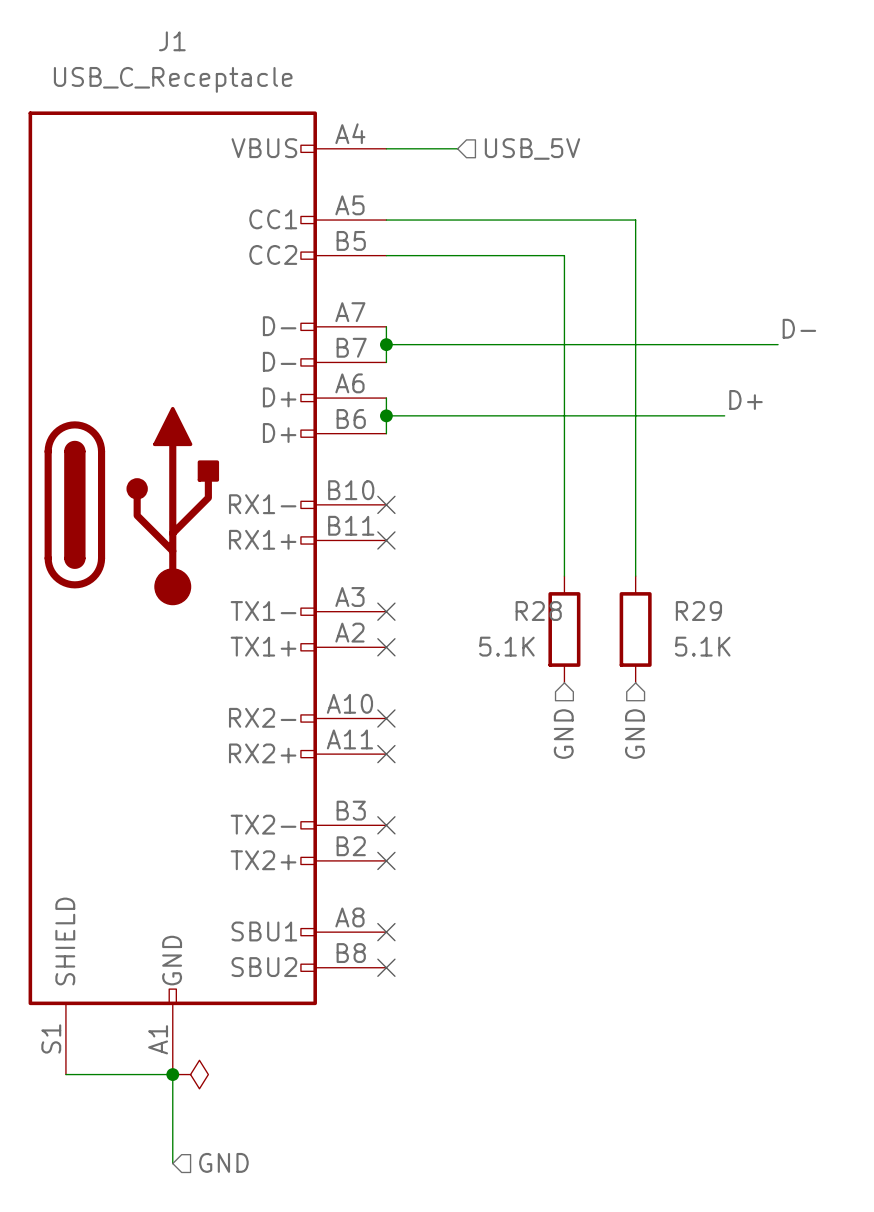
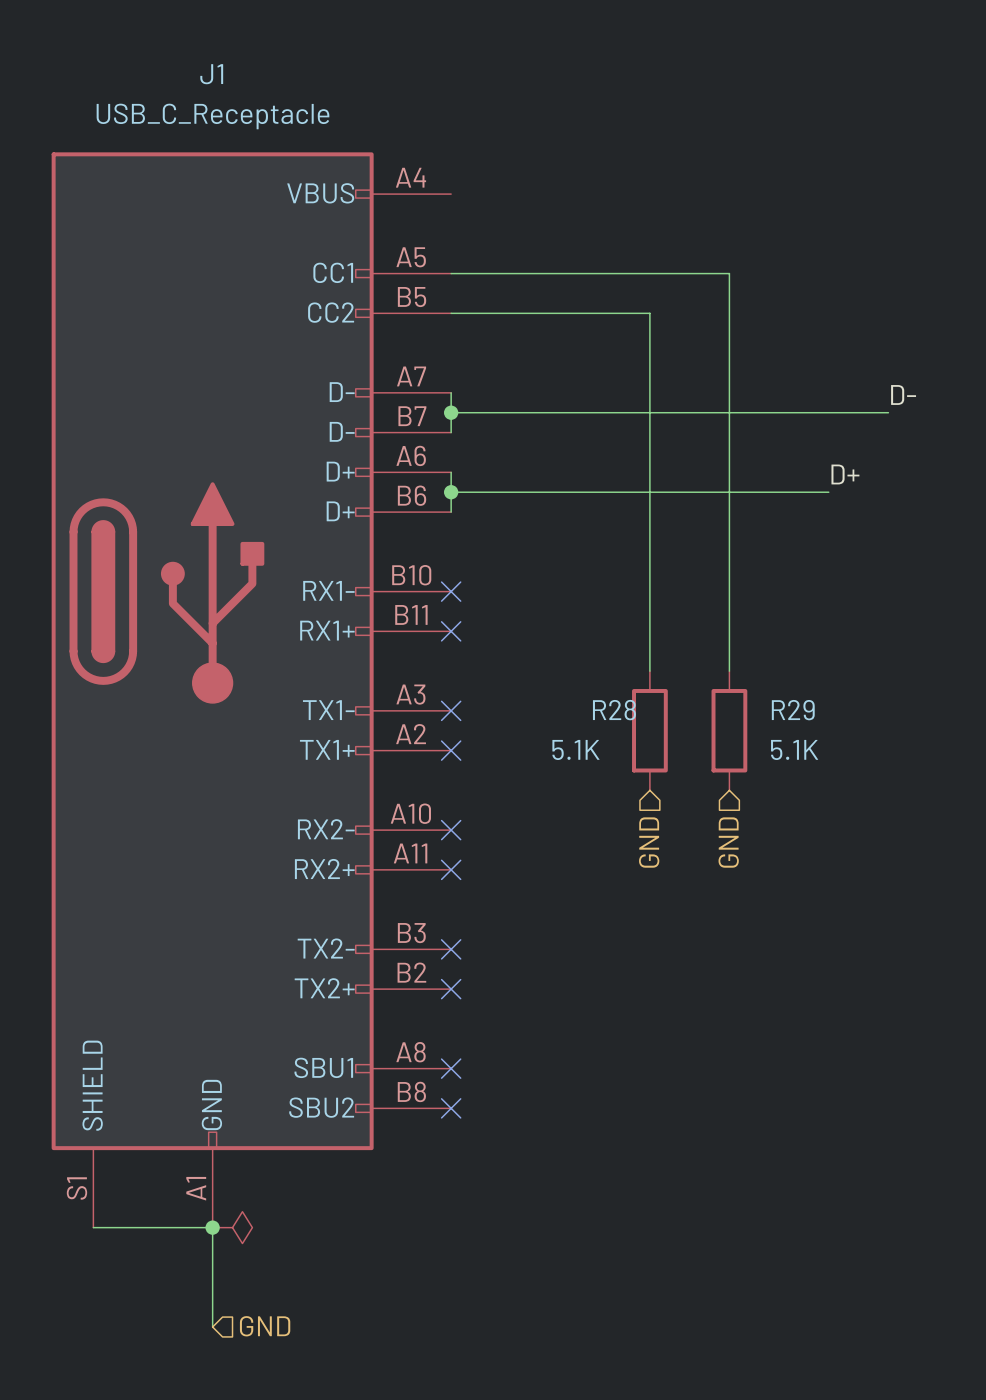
wire: (386, 148) (457, 148) -> none
hierarchical label: USB_5V (532, 148) -> none

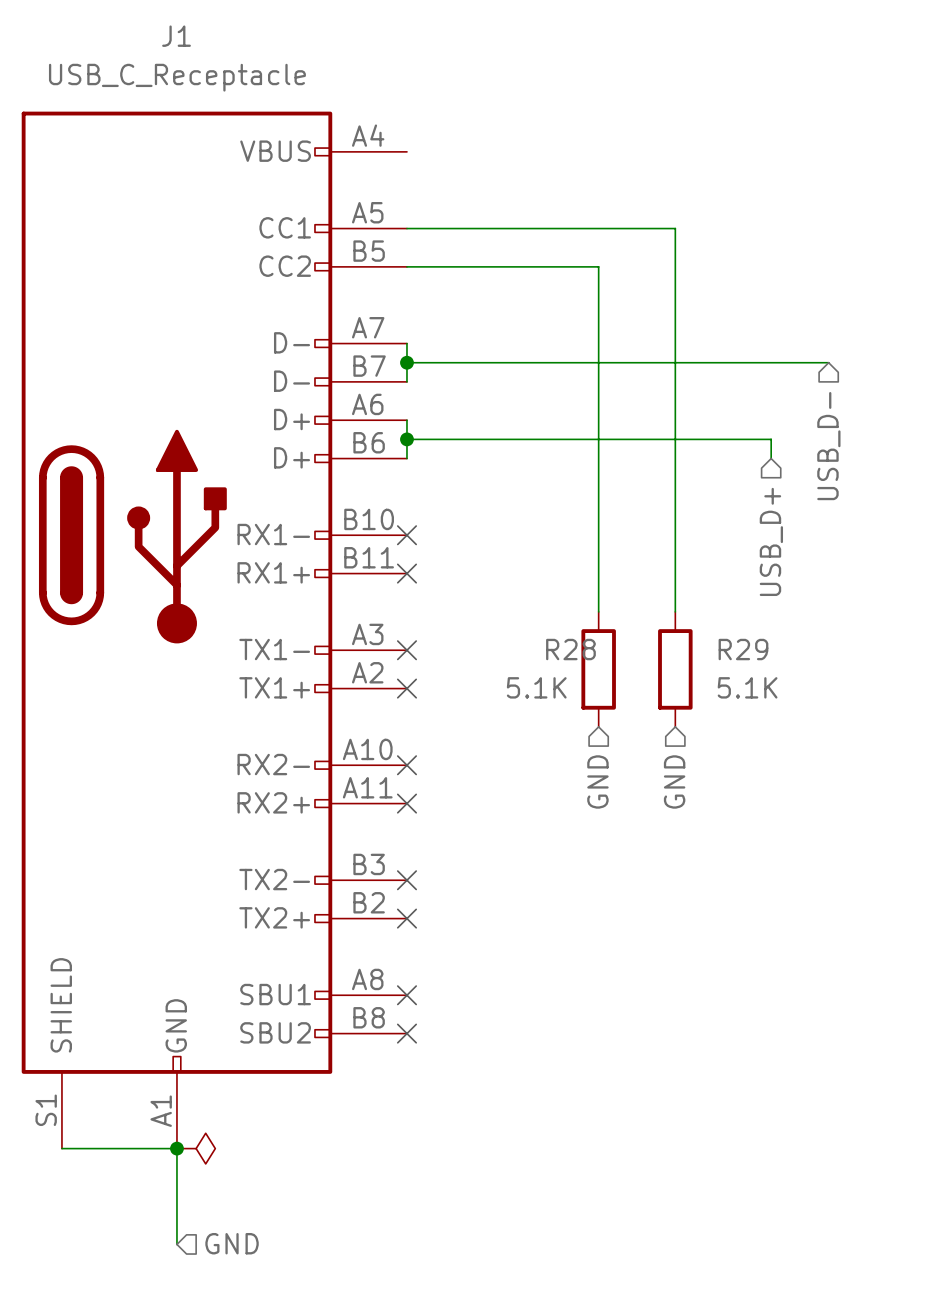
label: D- (903, 394) -> none
label: D+ (845, 474) -> none
hierarchical label: none -> USB_D- (828, 446)
wire: none -> (771, 439) (771, 458)
hierarchical label: none -> USB_D+ (771, 541)

